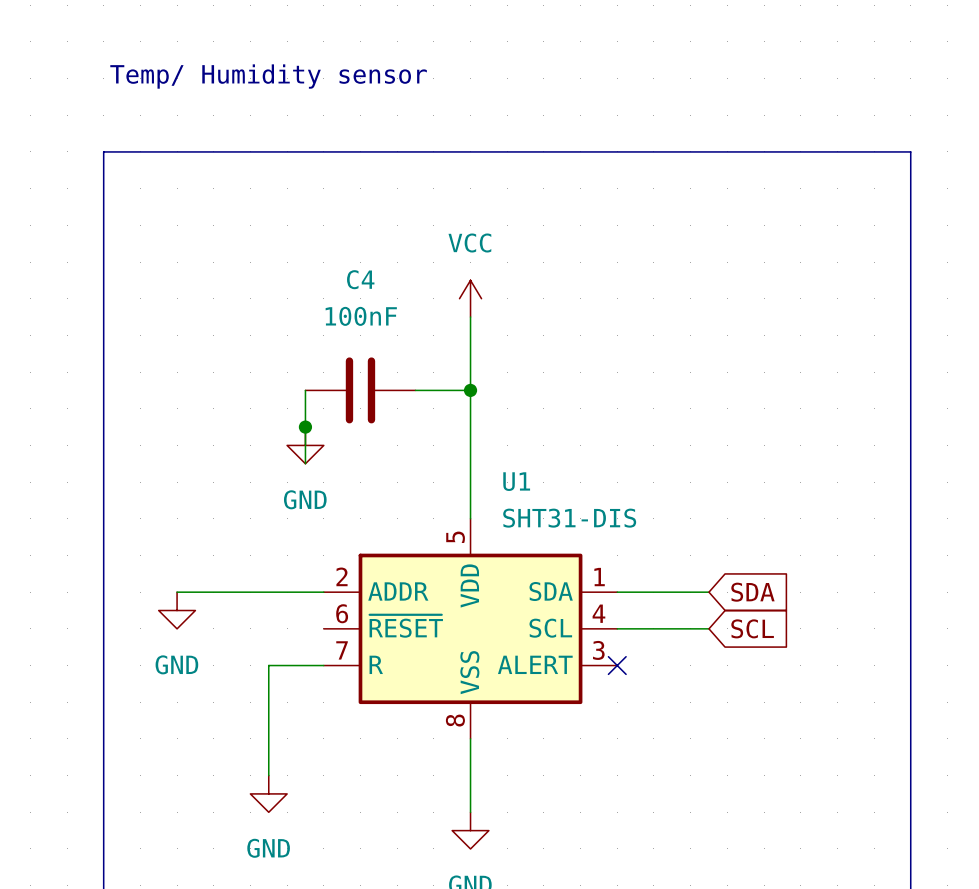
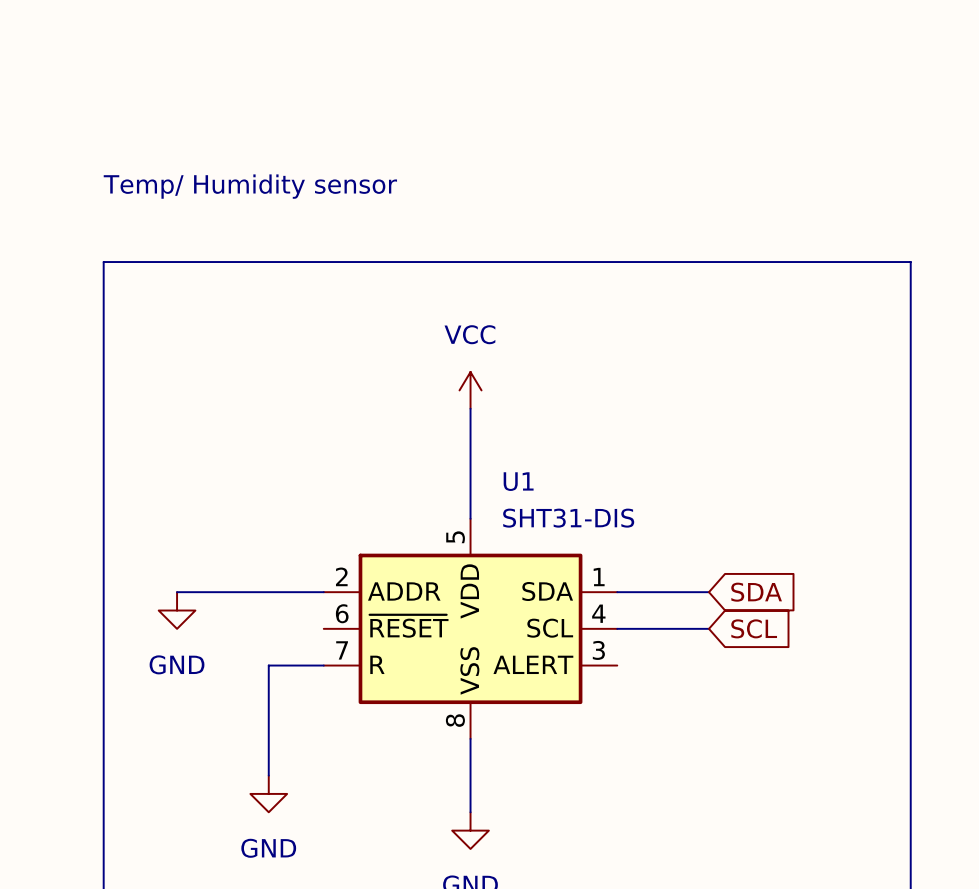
text position: Temp/ Humidity sensor (268, 76) -> Temp/ Humidity sensor (250, 186)
line: (103, 262) (103, 151) (910, 151) (910, 262) -> (103, 262) (910, 262)
power symbol position: VCC (470, 298) -> VCC (470, 390)
wire: (470, 317) (470, 408) -> none
wire: (305, 390) (305, 463) -> none
C4: 100nF (360, 390) -> none
wire: (415, 390) (470, 390) -> none
junction: (470, 390) -> none
junction: (305, 427) -> none
power symbol: GND (305, 445) -> none
no-connect mark: (617, 665) -> none

